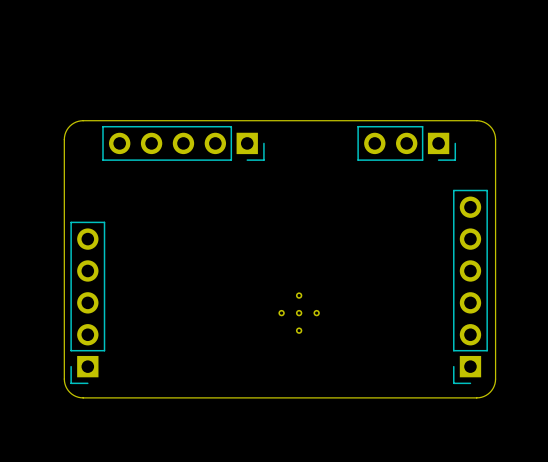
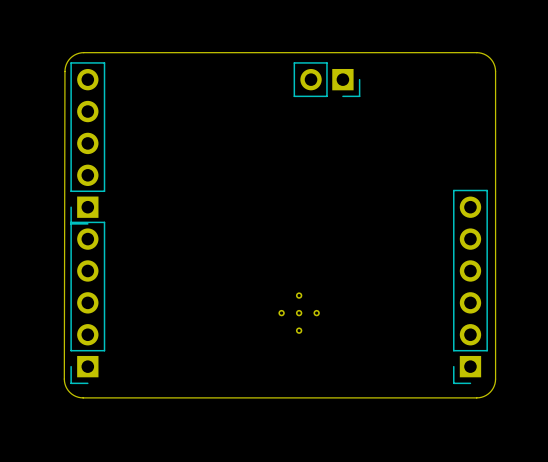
part: none -> (326, 79)
board edge: (495, 139) (490, 126) (476, 120) (83, 120) (73, 123) (66, 130) (64, 139) (64, 379) -> (495, 139) (495, 69) (490, 58) (481, 53) (83, 52) (74, 55) (67, 62) (64, 71) (64, 379)
part rotation: 0° (183, 143) -> 90° clockwise (87, 143)
part: (406, 143) -> none

